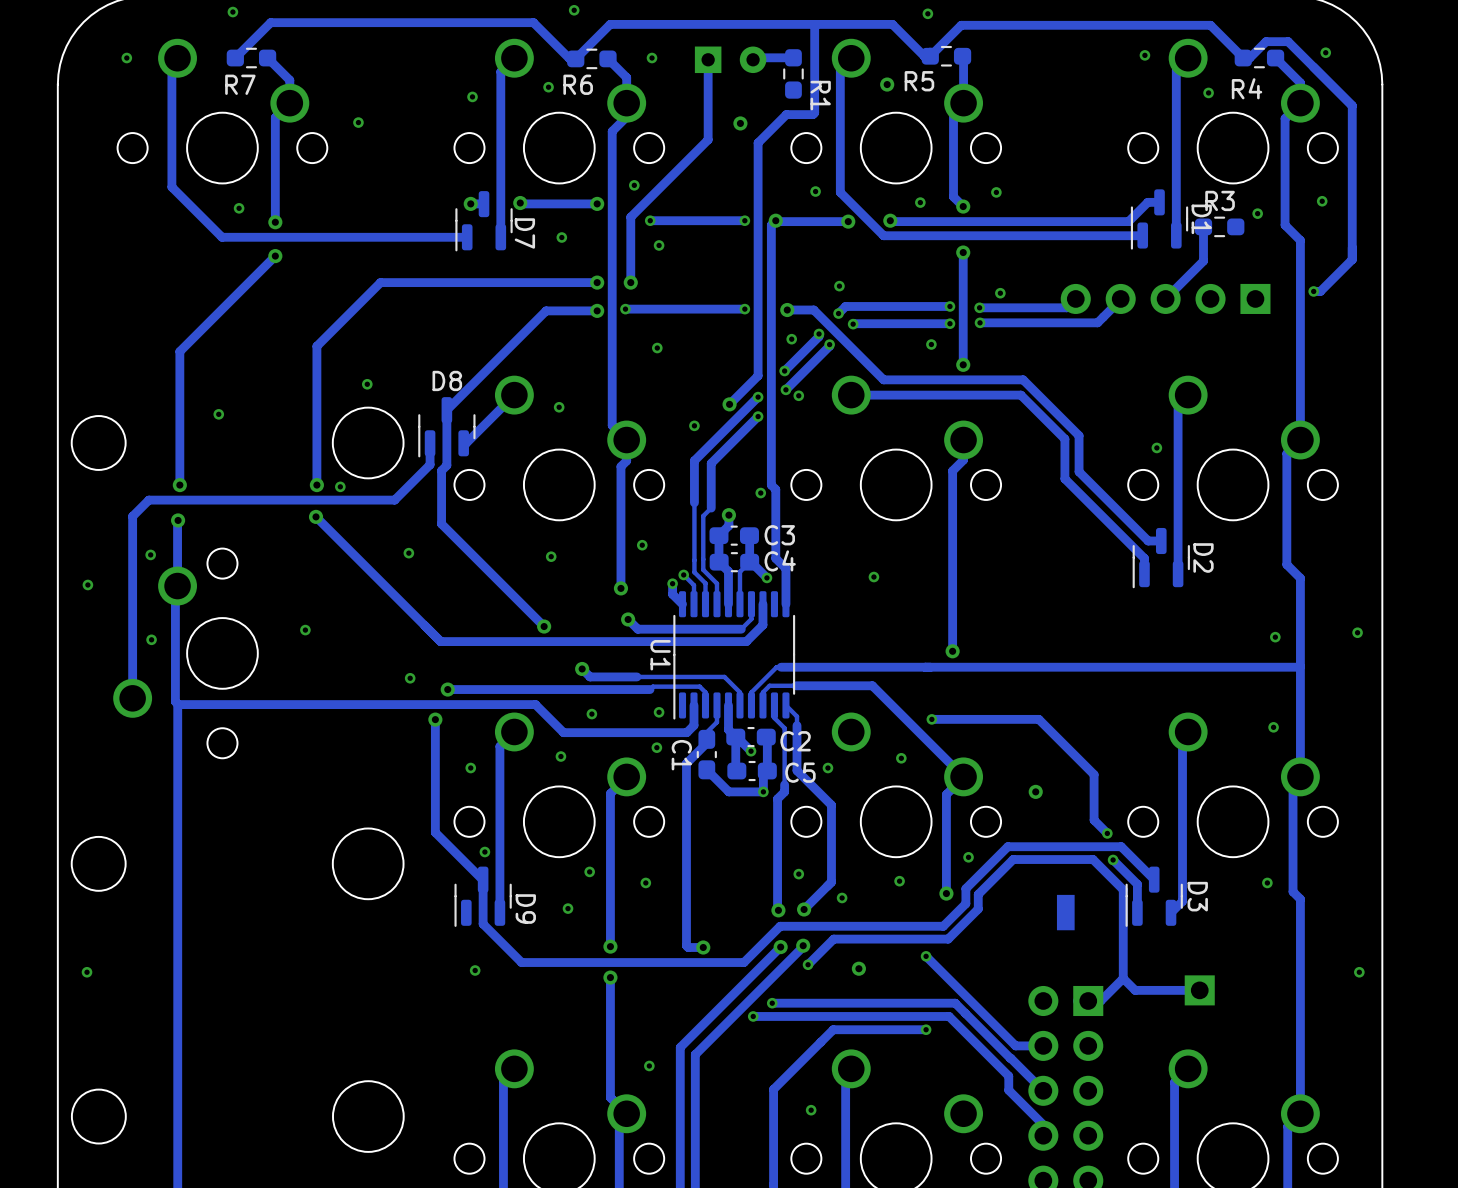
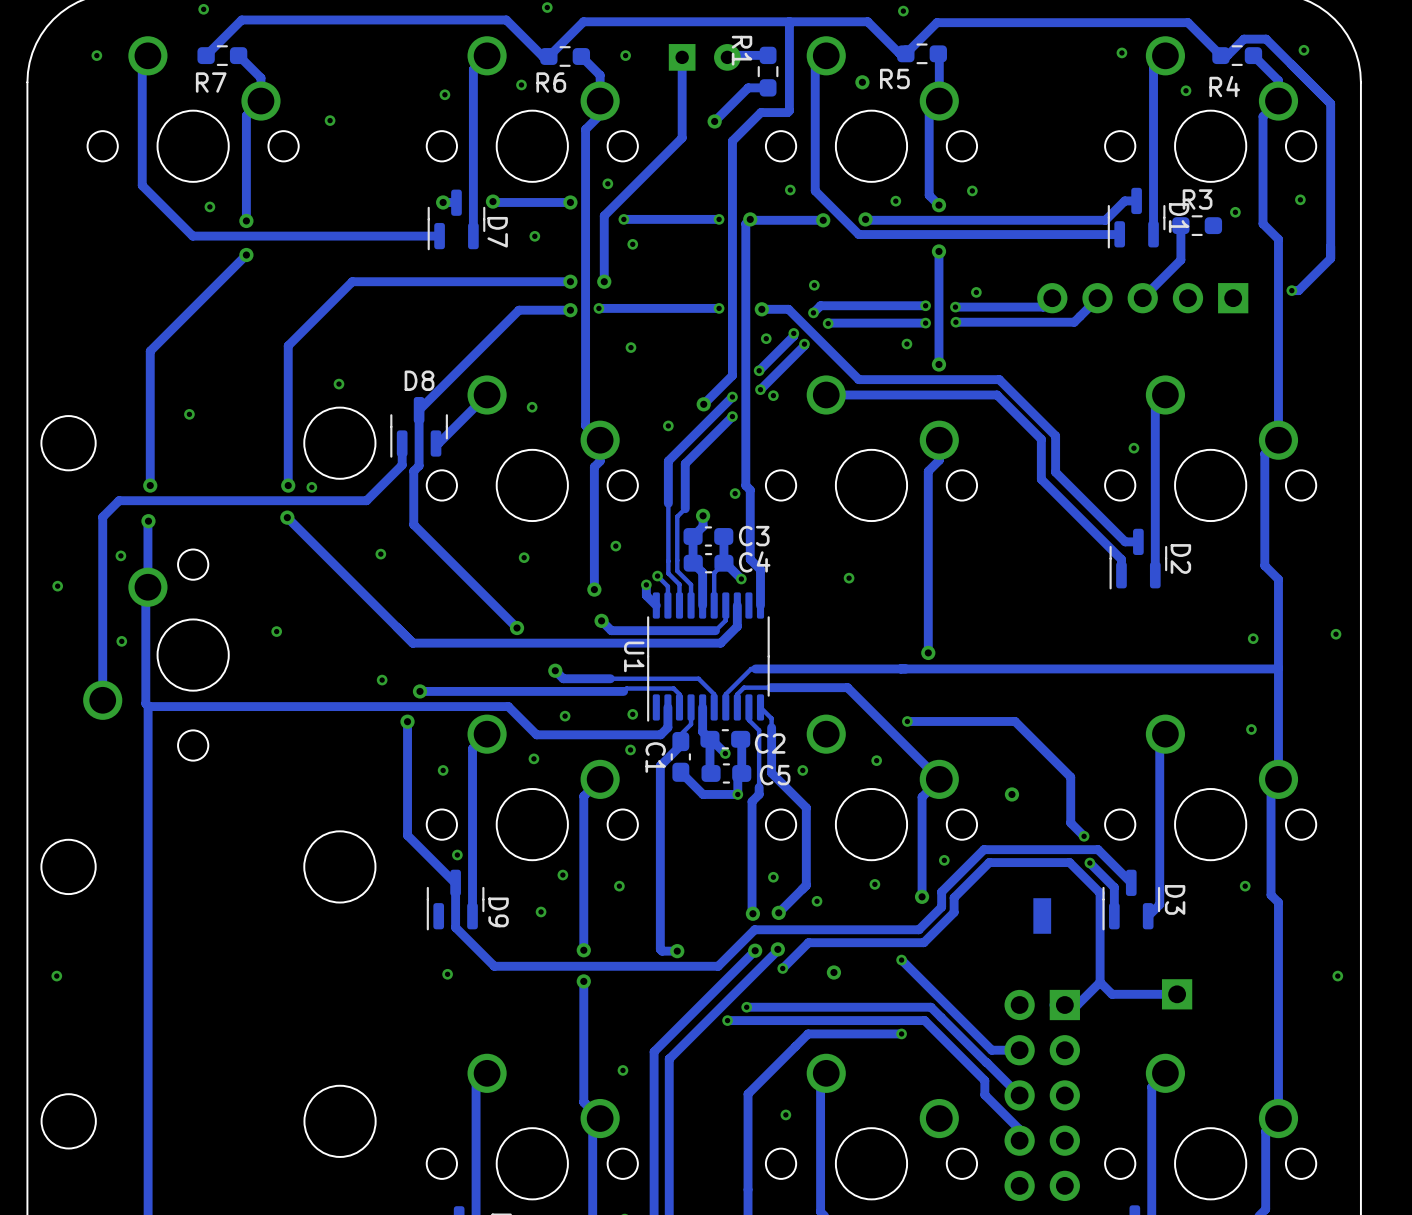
track: none -> (768, 87) (748, 87) (714, 121)
R1 name position: R1 (820, 95) -> R1 (742, 50)

